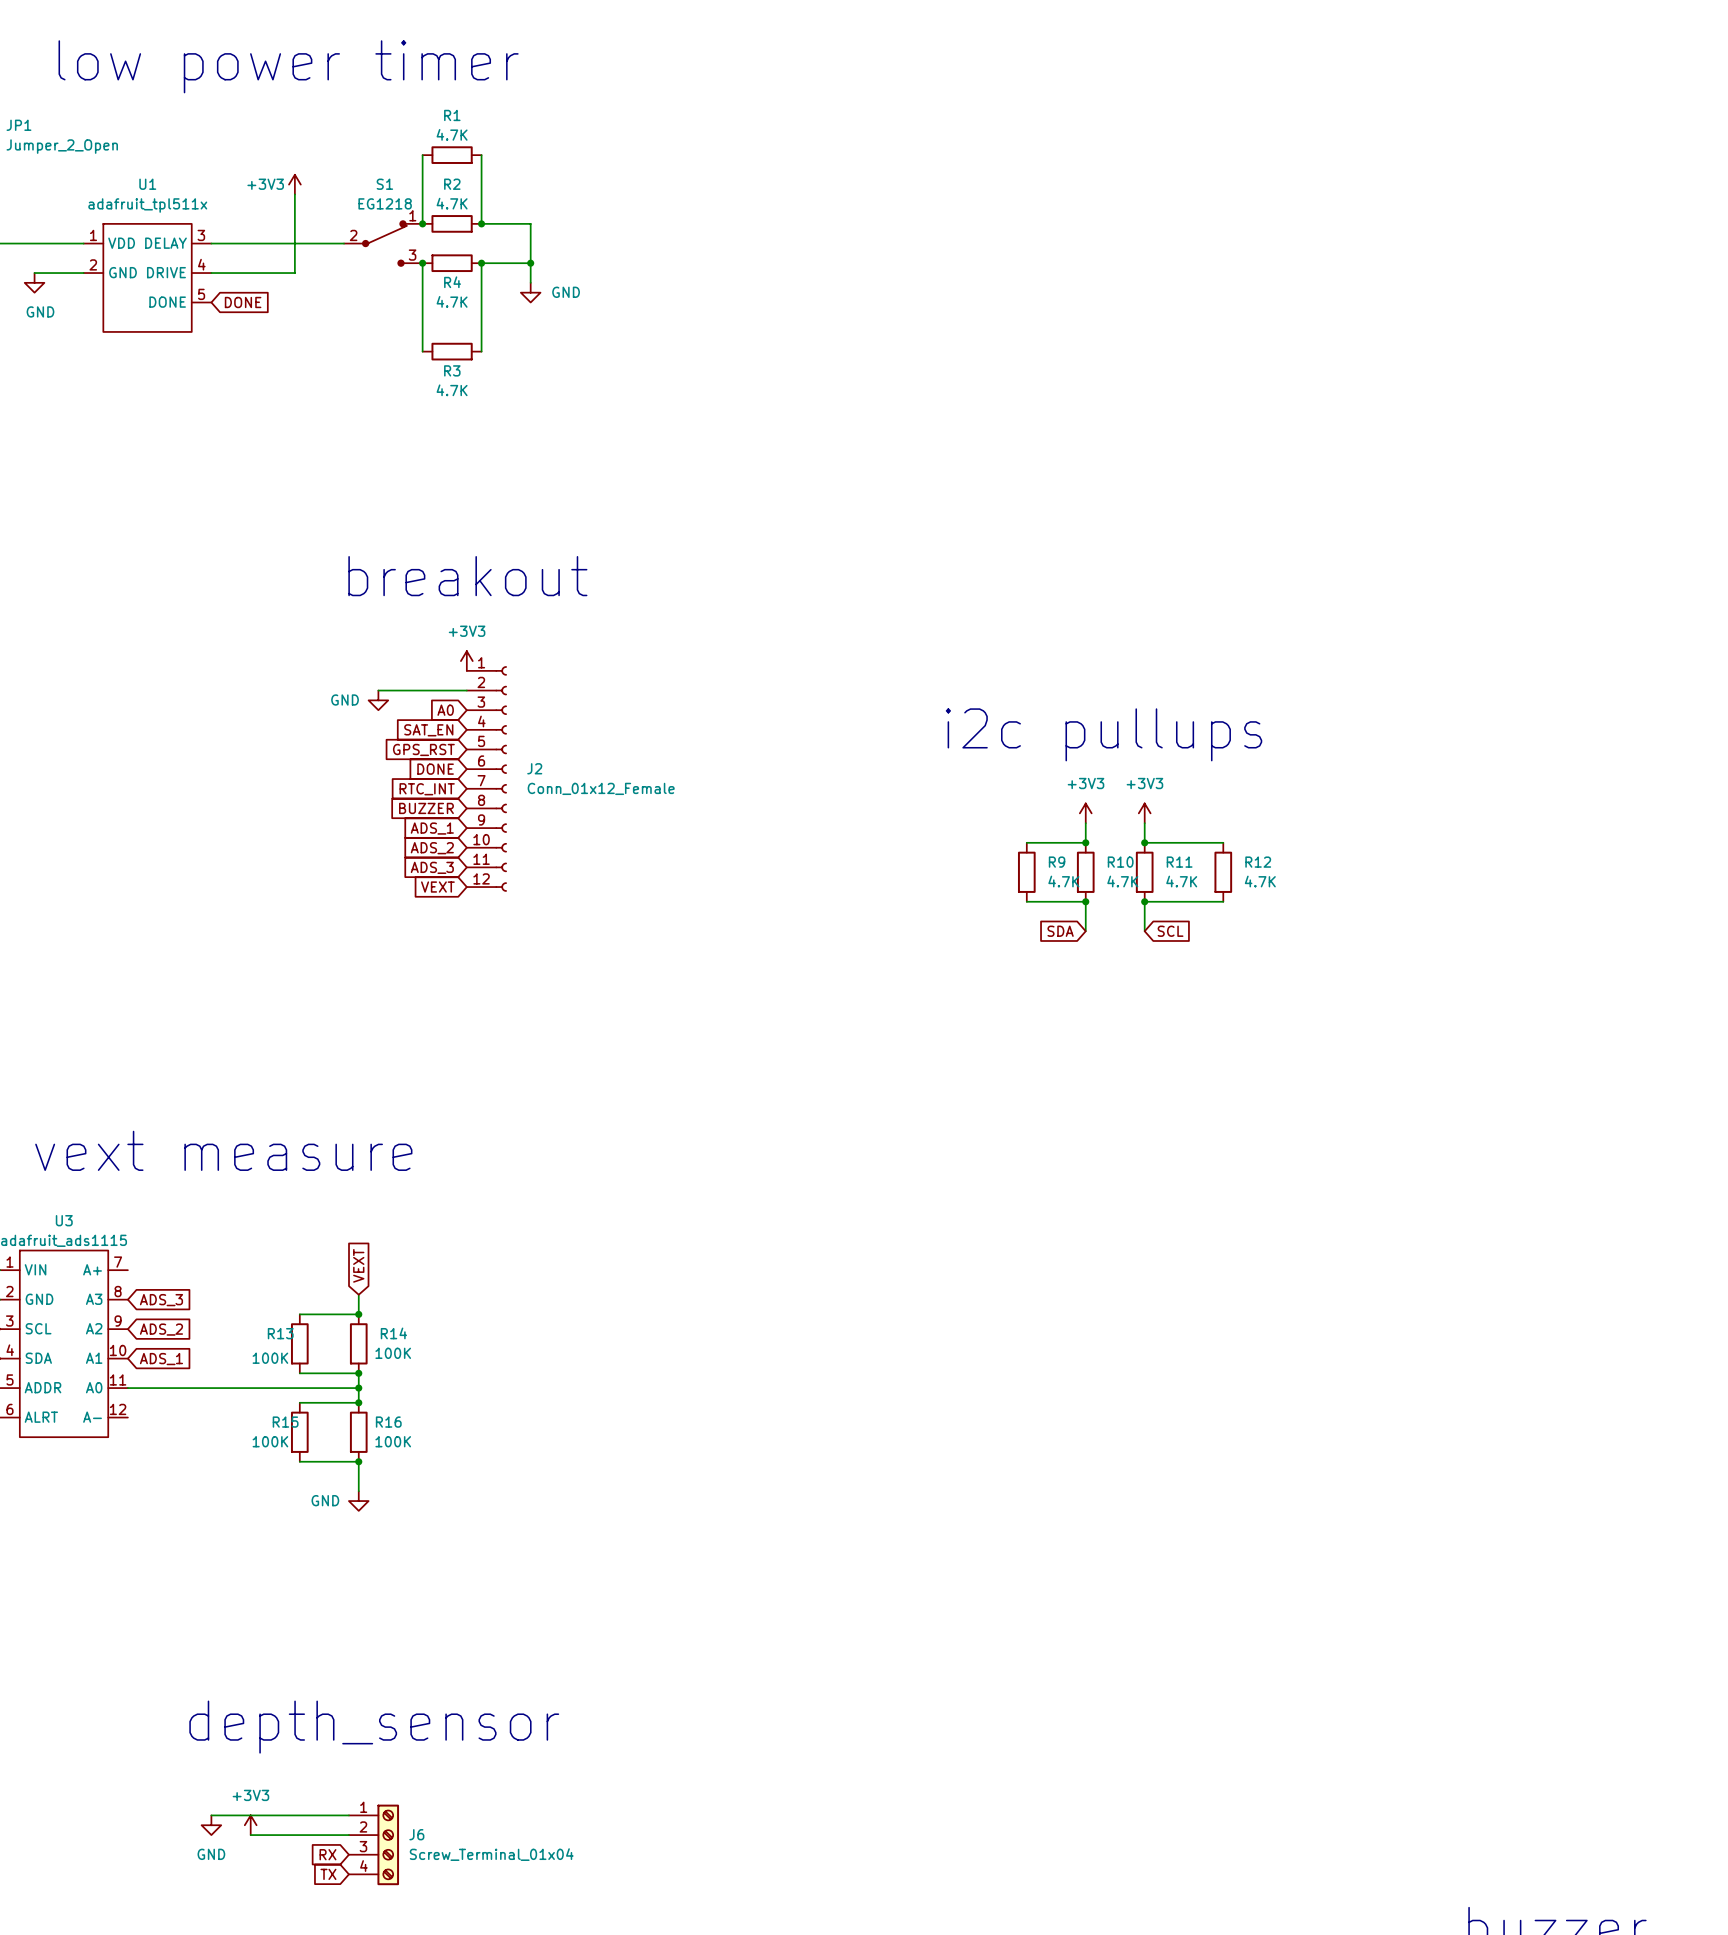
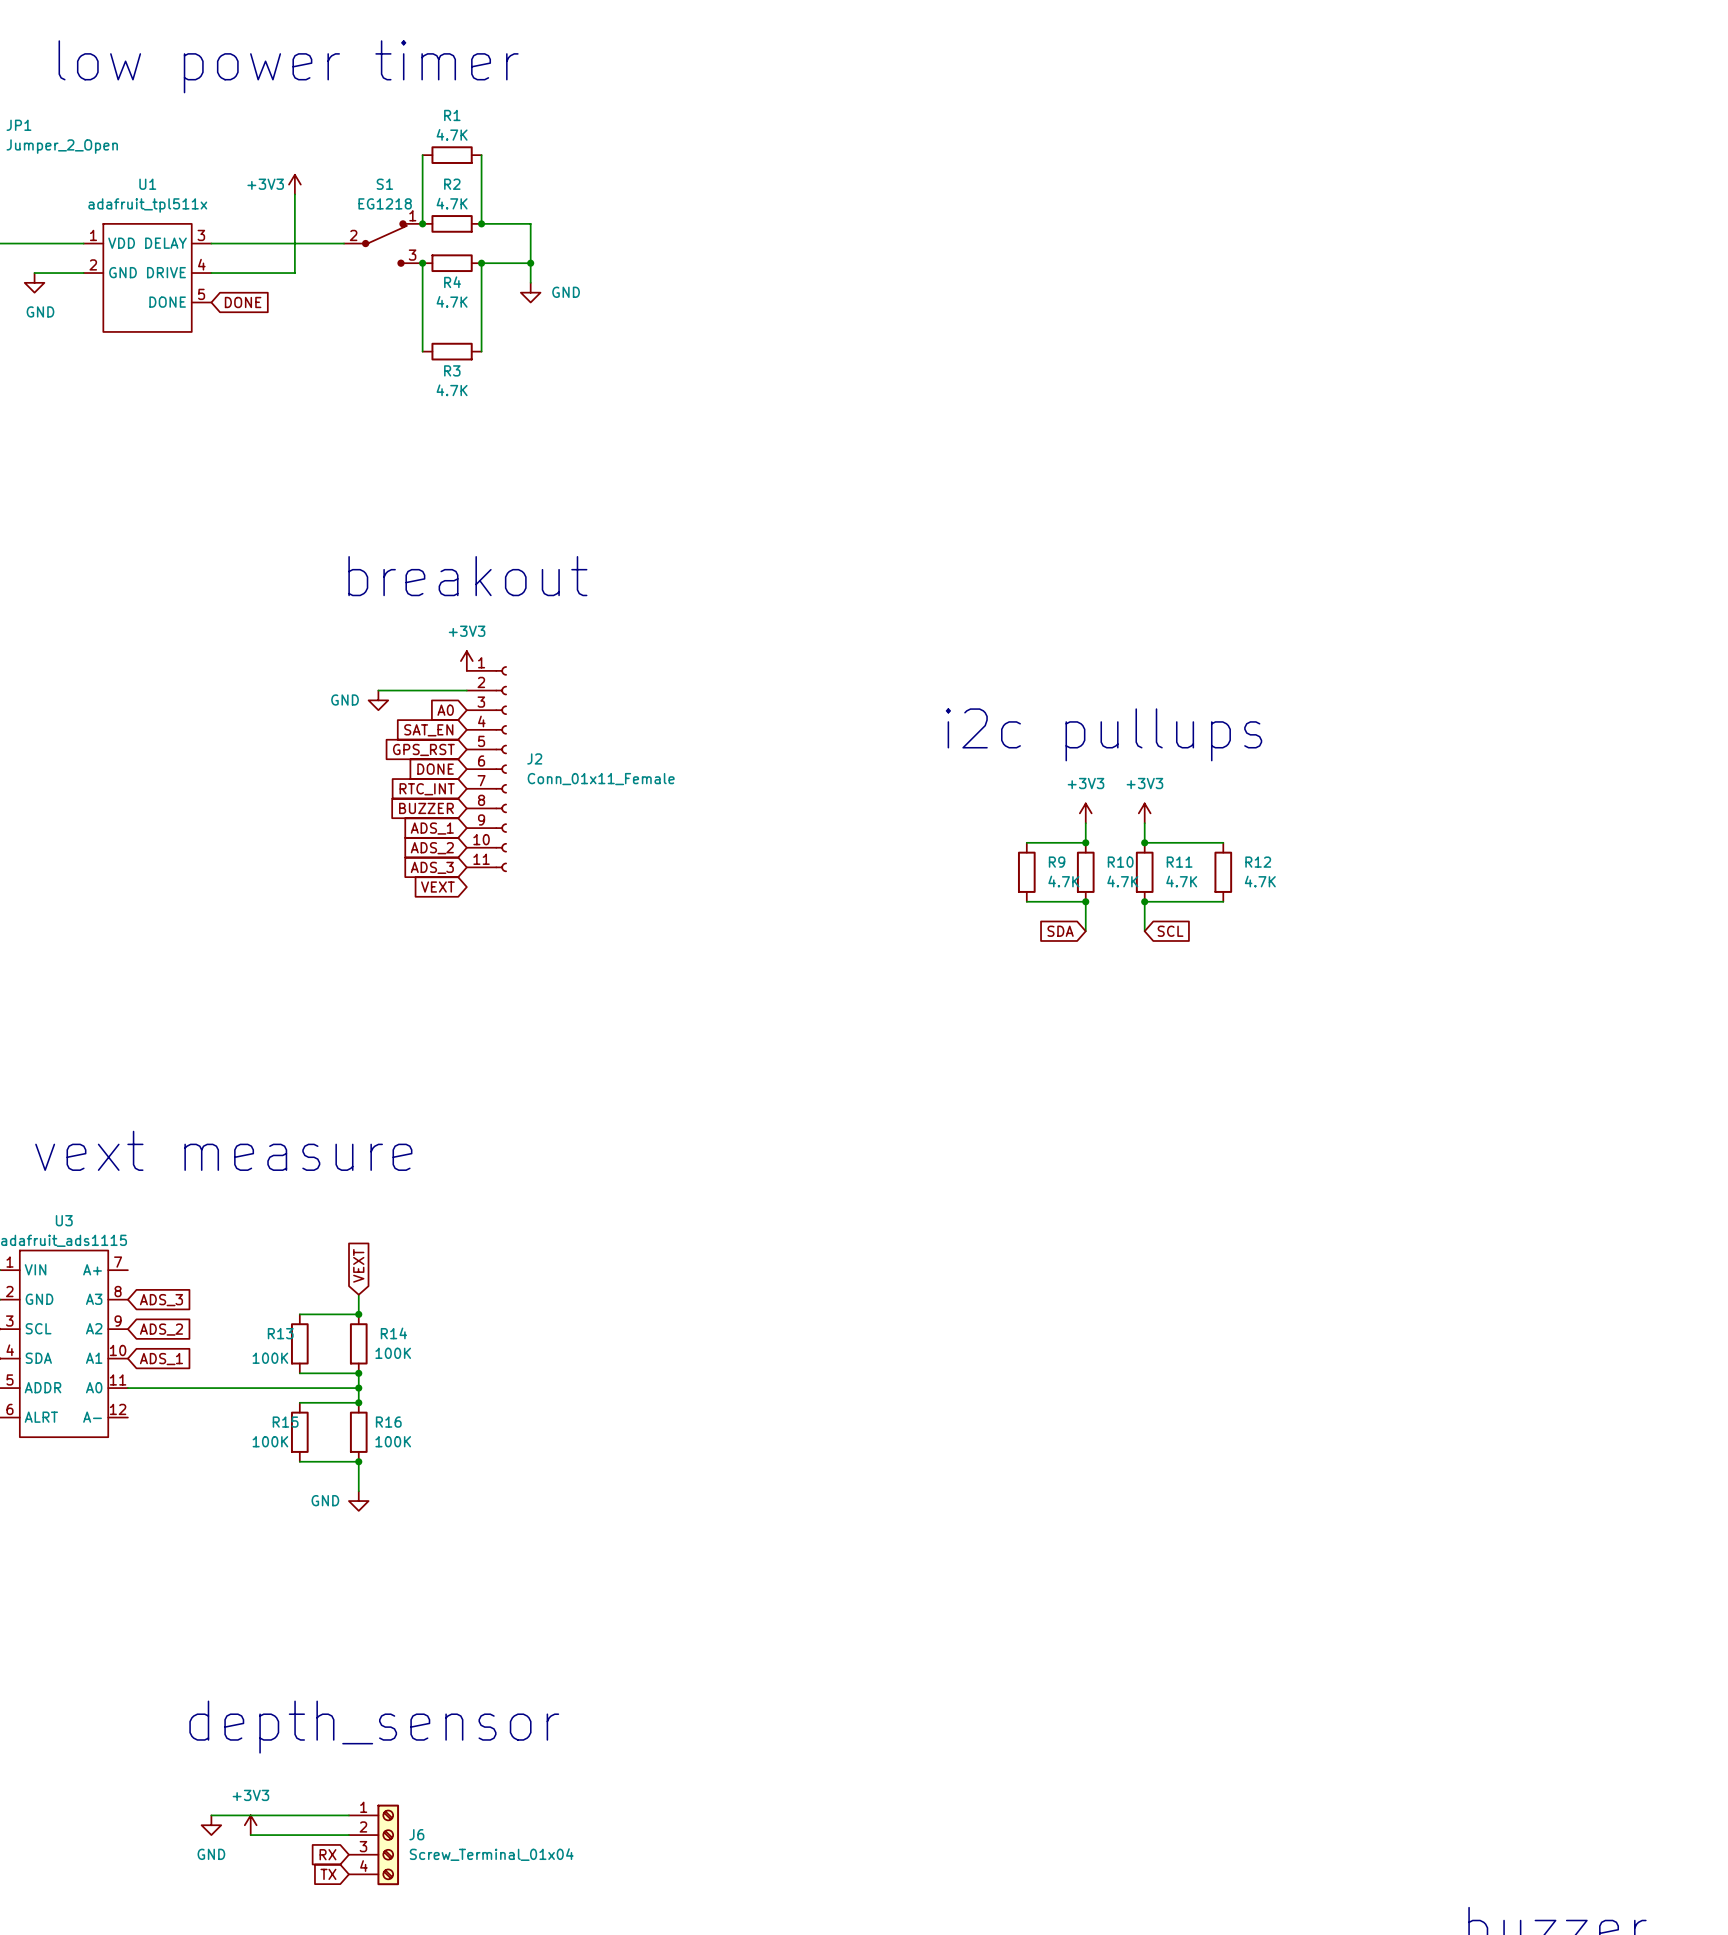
J2 symbol: [466, 666, 507, 892] -> [466, 666, 507, 872]
J2 value: Conn_01x12_Female (601, 788) -> Conn_01x11_Female (601, 779)

